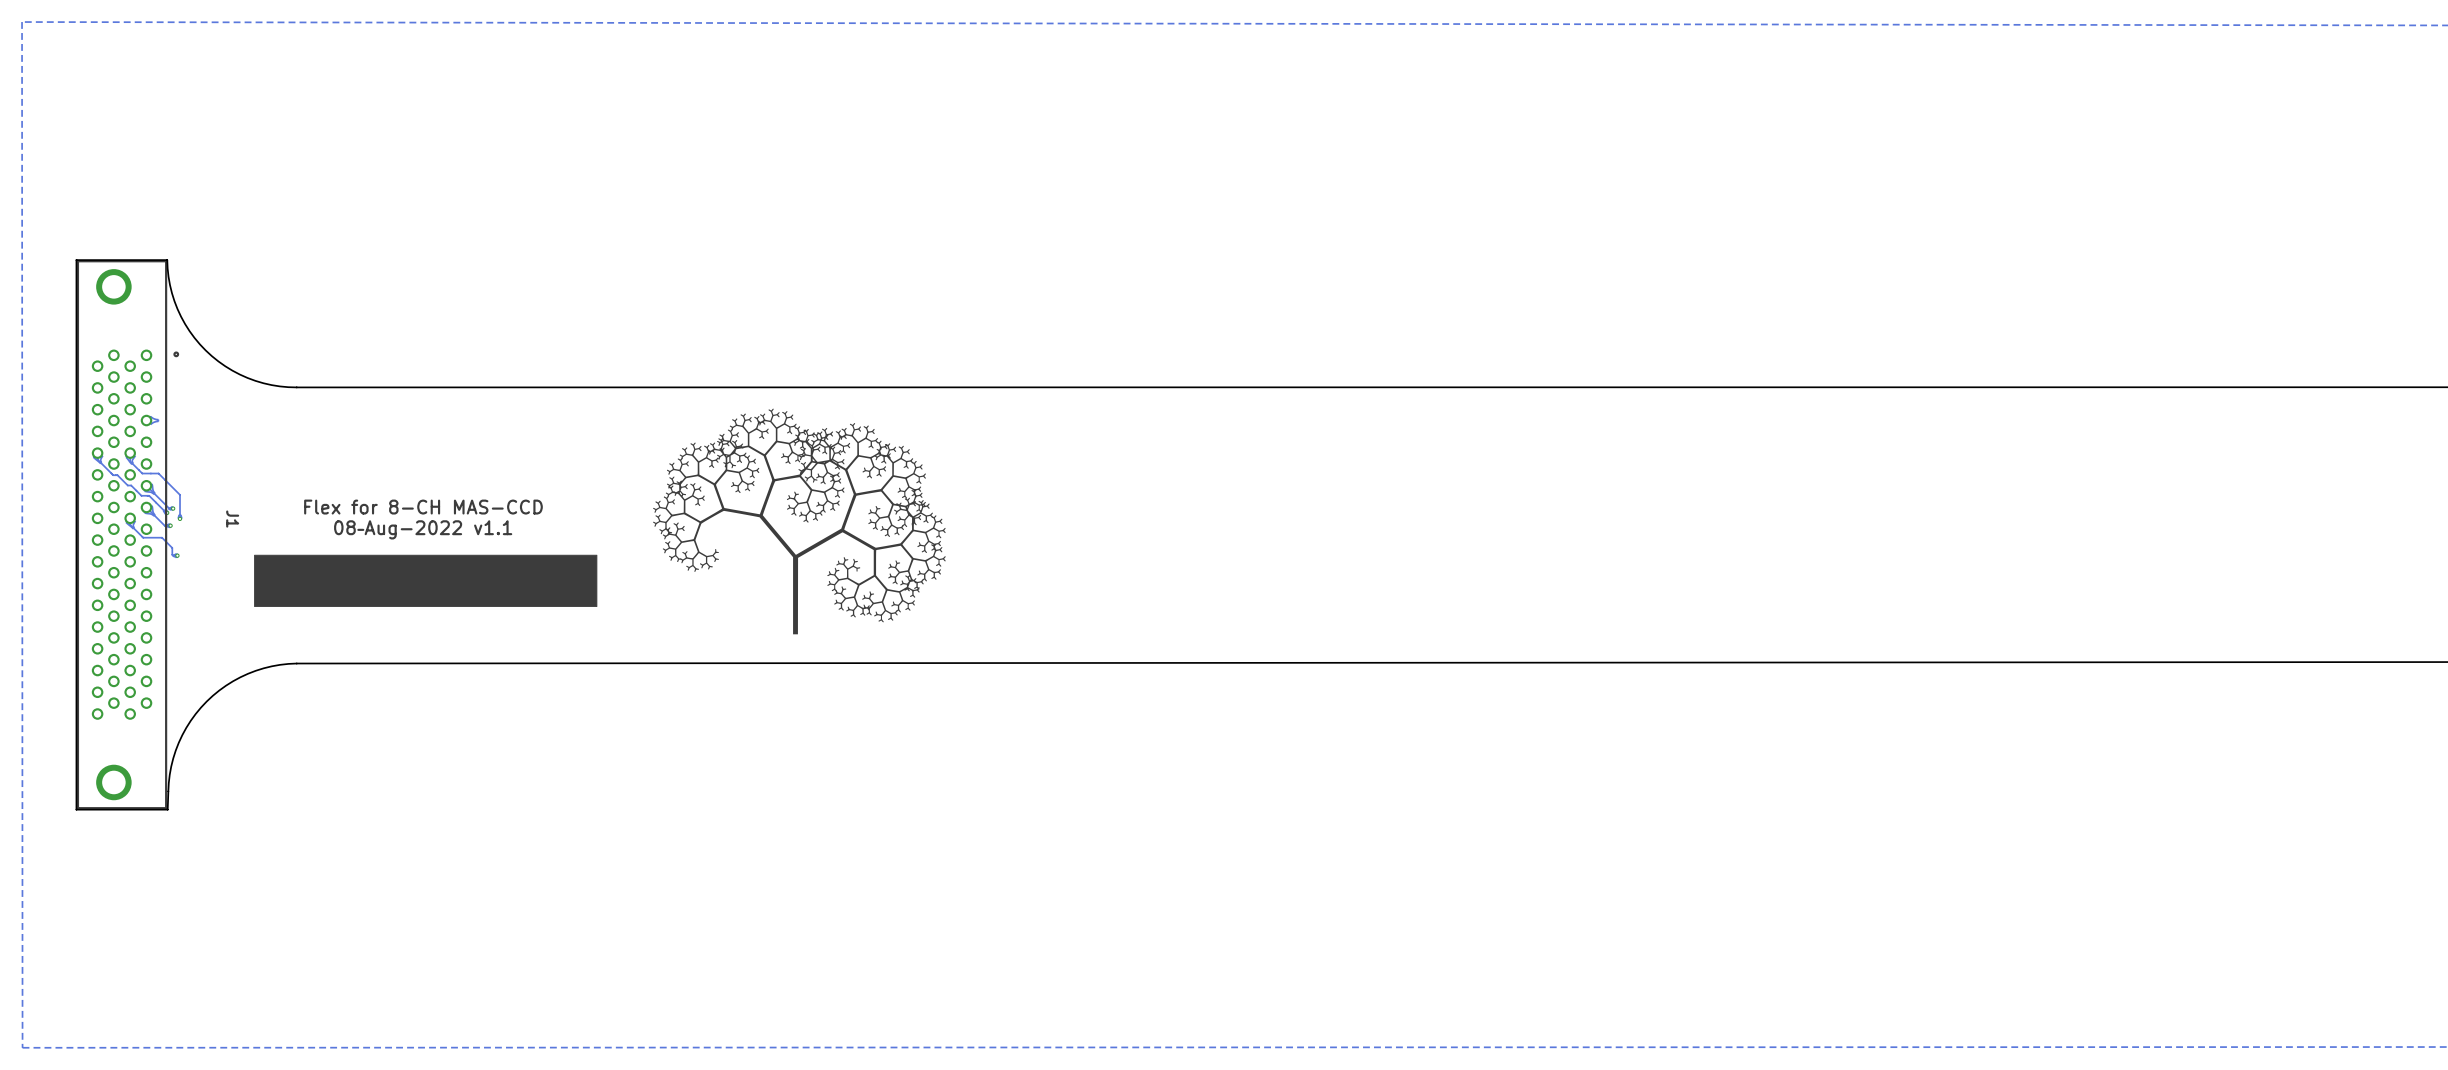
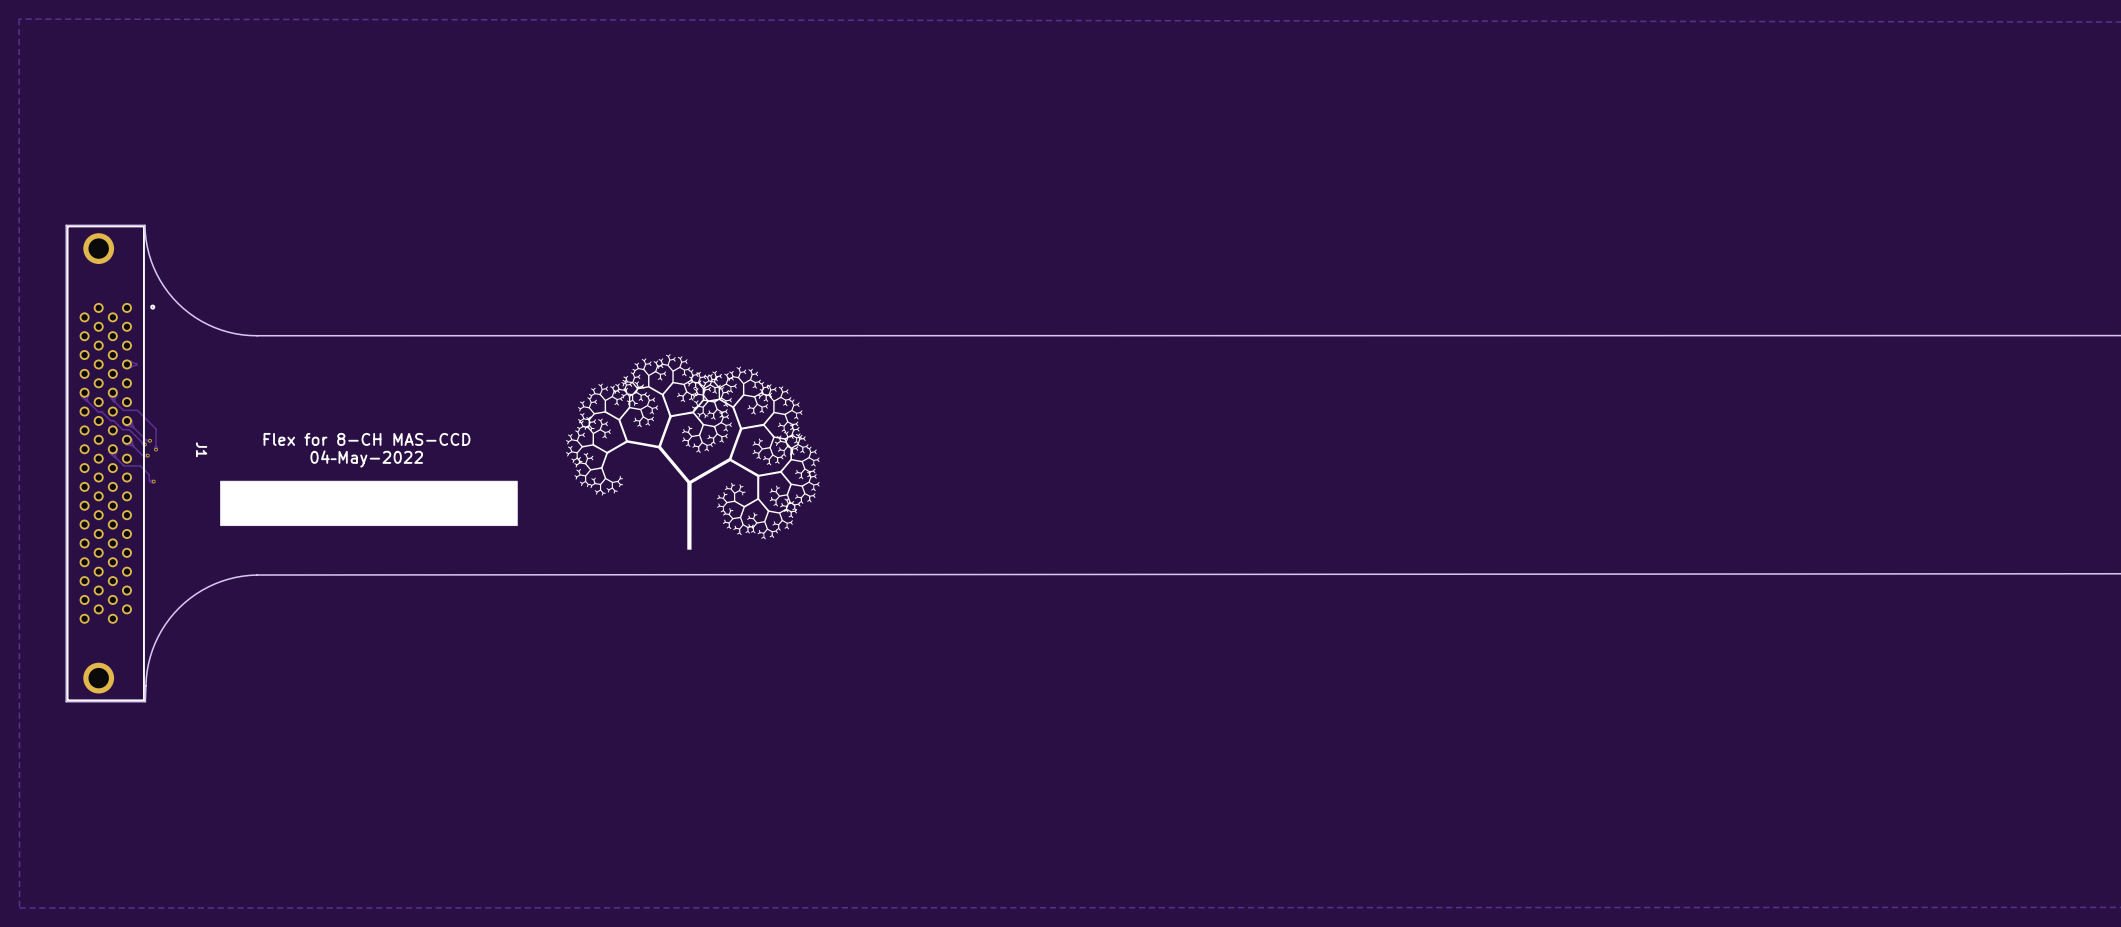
text: 08–Aug-2022 v1.1 (423, 529) -> 04–May-2022 (366, 458)

